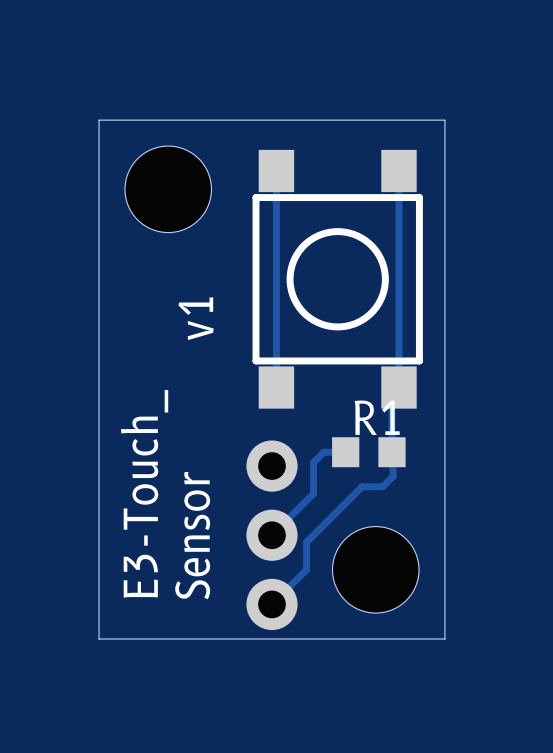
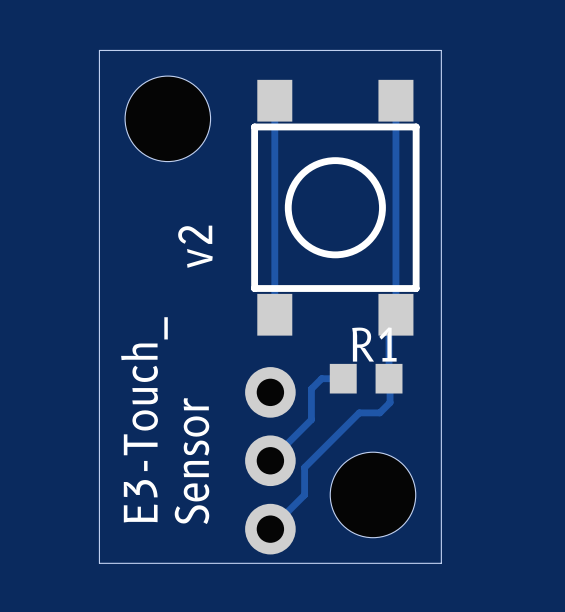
text: v1 (196, 318) -> v2 (195, 246)

